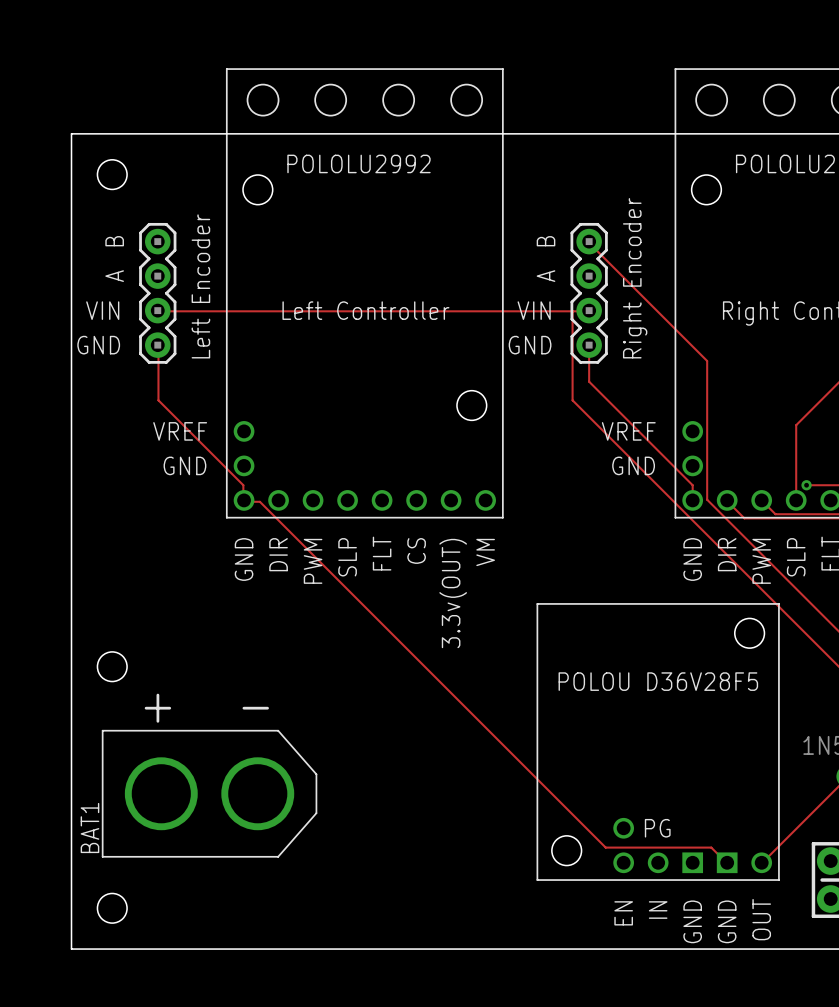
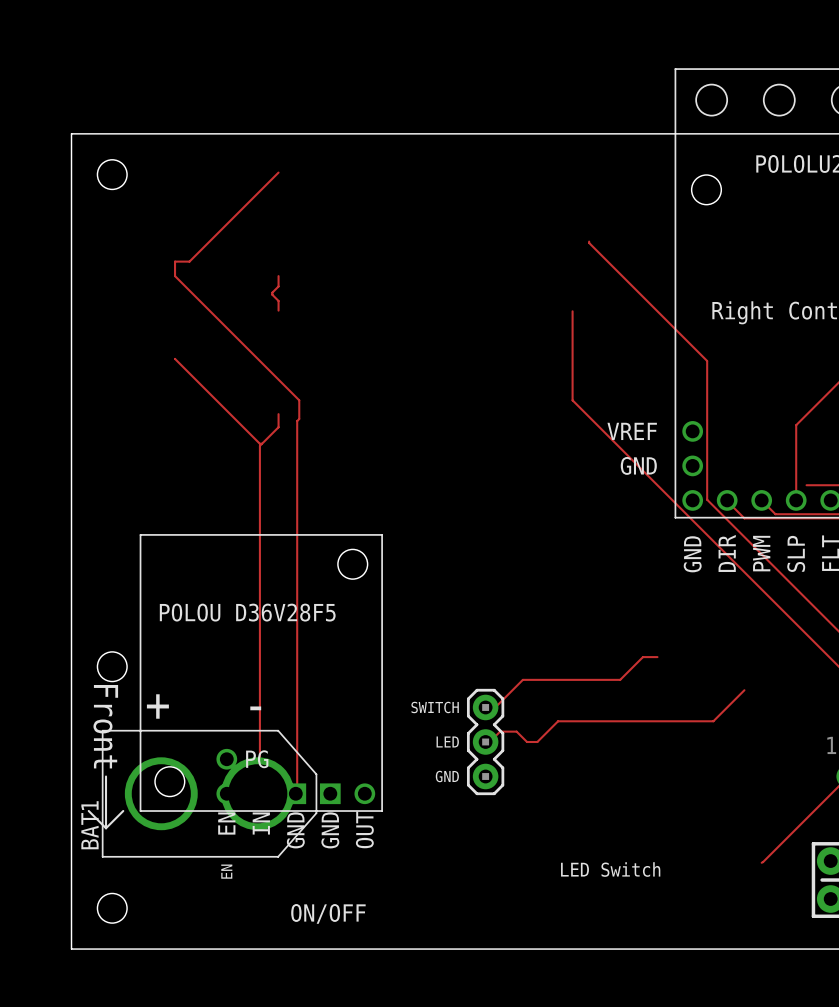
track: none -> (278, 172) (189, 261) (175, 261) (175, 276) (299, 400) (299, 418) (297, 421) (295, 793)
text: B (114, 241) -> none
text: B (546, 241) -> none
text: A (114, 276) -> none
track: none -> (278, 276) (278, 286) (272, 292) (278, 300) (278, 310)
text: A (546, 276) -> none
text: Right Encoder (635, 278) -> none
text: Left Encoder (200, 286) -> none
part: (157, 293) -> none
part: Left Controller (364, 293) -> none
part: (589, 293) -> none
text: VIN (102, 310) -> none
track: (157, 310) (589, 310) -> none
text: VIN (534, 310) -> none
text: GND (98, 345) -> none
track: (157, 345) (158, 400) (243, 485) (243, 499) (245, 501) (259, 501) (605, 847) (711, 847) (727, 862) -> none
text: GND (530, 345) -> none
track: (589, 345) (589, 381) (692, 485) (692, 500) -> none
track: none -> (175, 358) (261, 443)
track: none -> (278, 414) (278, 427) (259, 445) (261, 793)
via: (806, 485) -> none
track: none -> (657, 657) (642, 657) (620, 679) (522, 679) (495, 706) (485, 707)
part: none -> (261, 672)
track: none -> (744, 690) (713, 721) (558, 721) (537, 741) (527, 741) (516, 731) (500, 731) (489, 741) (485, 741)
text: none -> SWITCH (435, 707)
text: none -> Front (105, 726)
text: none -> LED (447, 741)
part: none -> (485, 741)
part: (658, 741) -> none
text: none -> PG (257, 759)
line: none -> (106, 776) (106, 828)
text: none -> GND (447, 776)
line: none -> (88, 811) (106, 828)
line: none -> (123, 811) (106, 828)
text: none -> IN (261, 823)
text: none -> EN (226, 823)
text: PG (657, 828) -> none
text: none -> OUT (364, 829)
text: none -> GND (295, 830)
text: none -> GND (330, 830)
text: none -> EN (226, 871)
text: none -> LED Switch (610, 869)
text: IN (658, 910) -> none
text: EN (623, 913) -> none
text: none -> ON/OFF (328, 913)
text: OUT (761, 919) -> none
text: GND (692, 921) -> none
text: GND (727, 921) -> none

